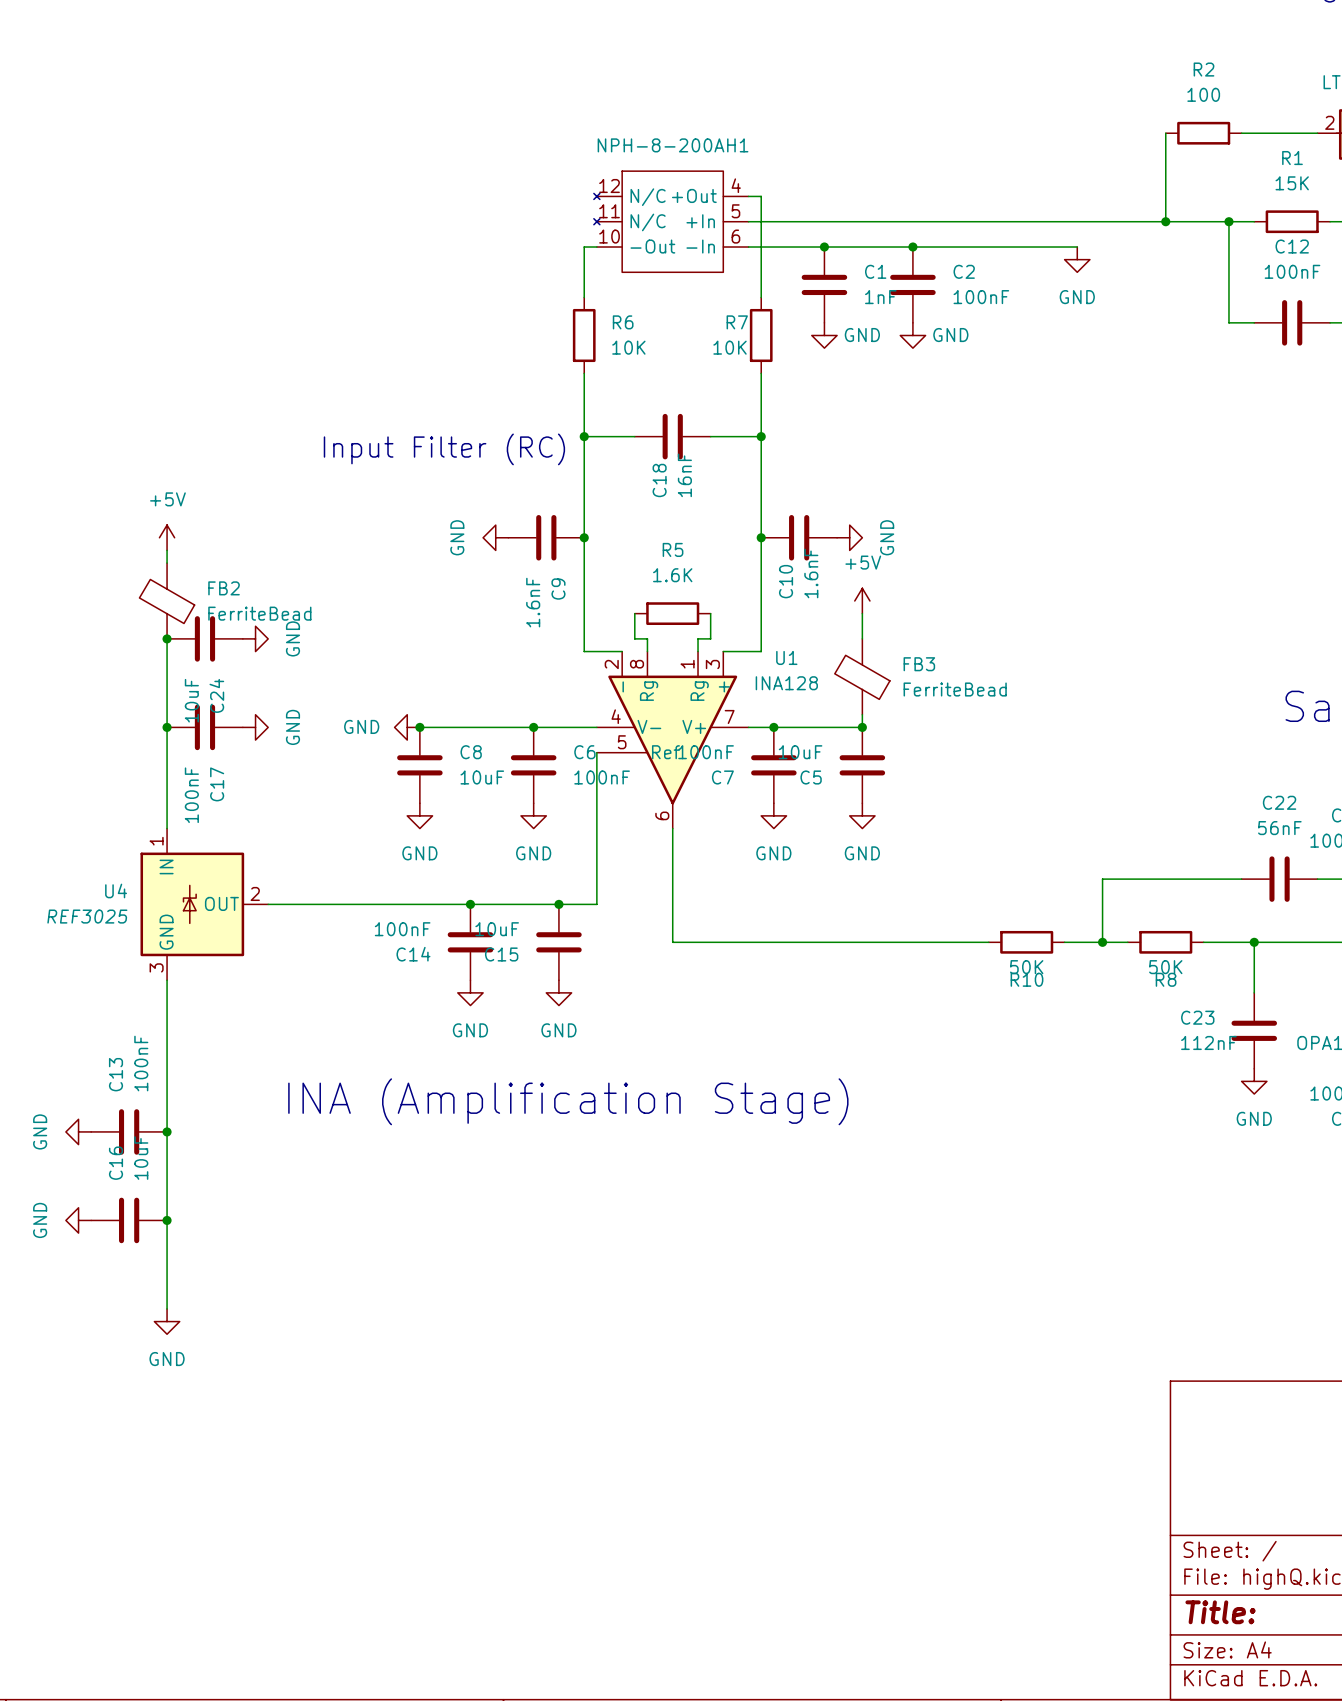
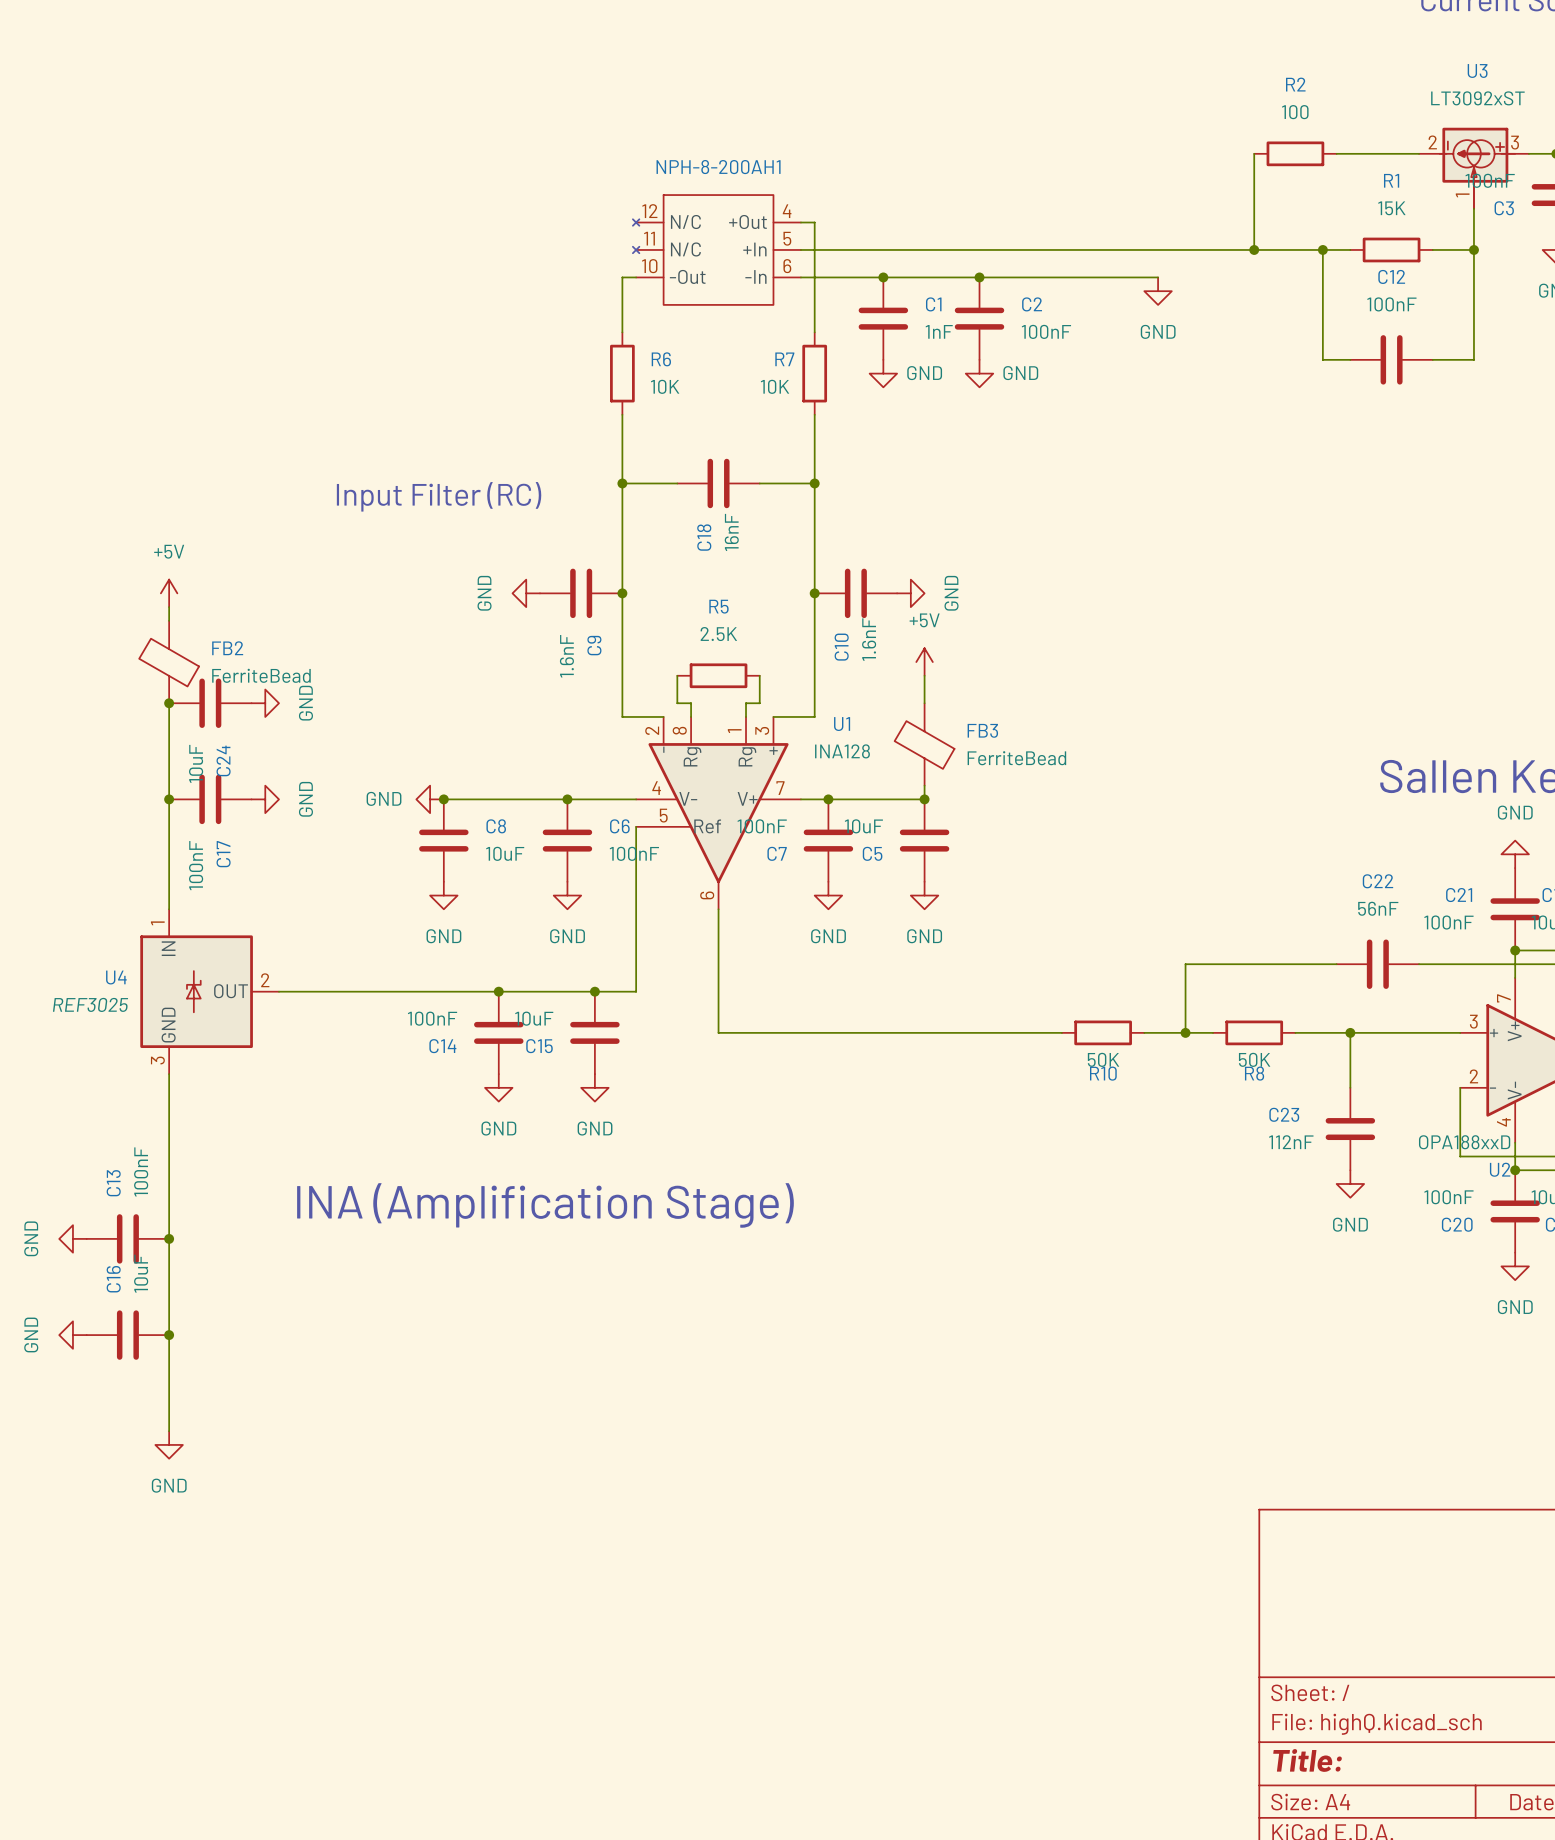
R5 value: 1.6K (672, 575) -> 2.5K (718, 634)

